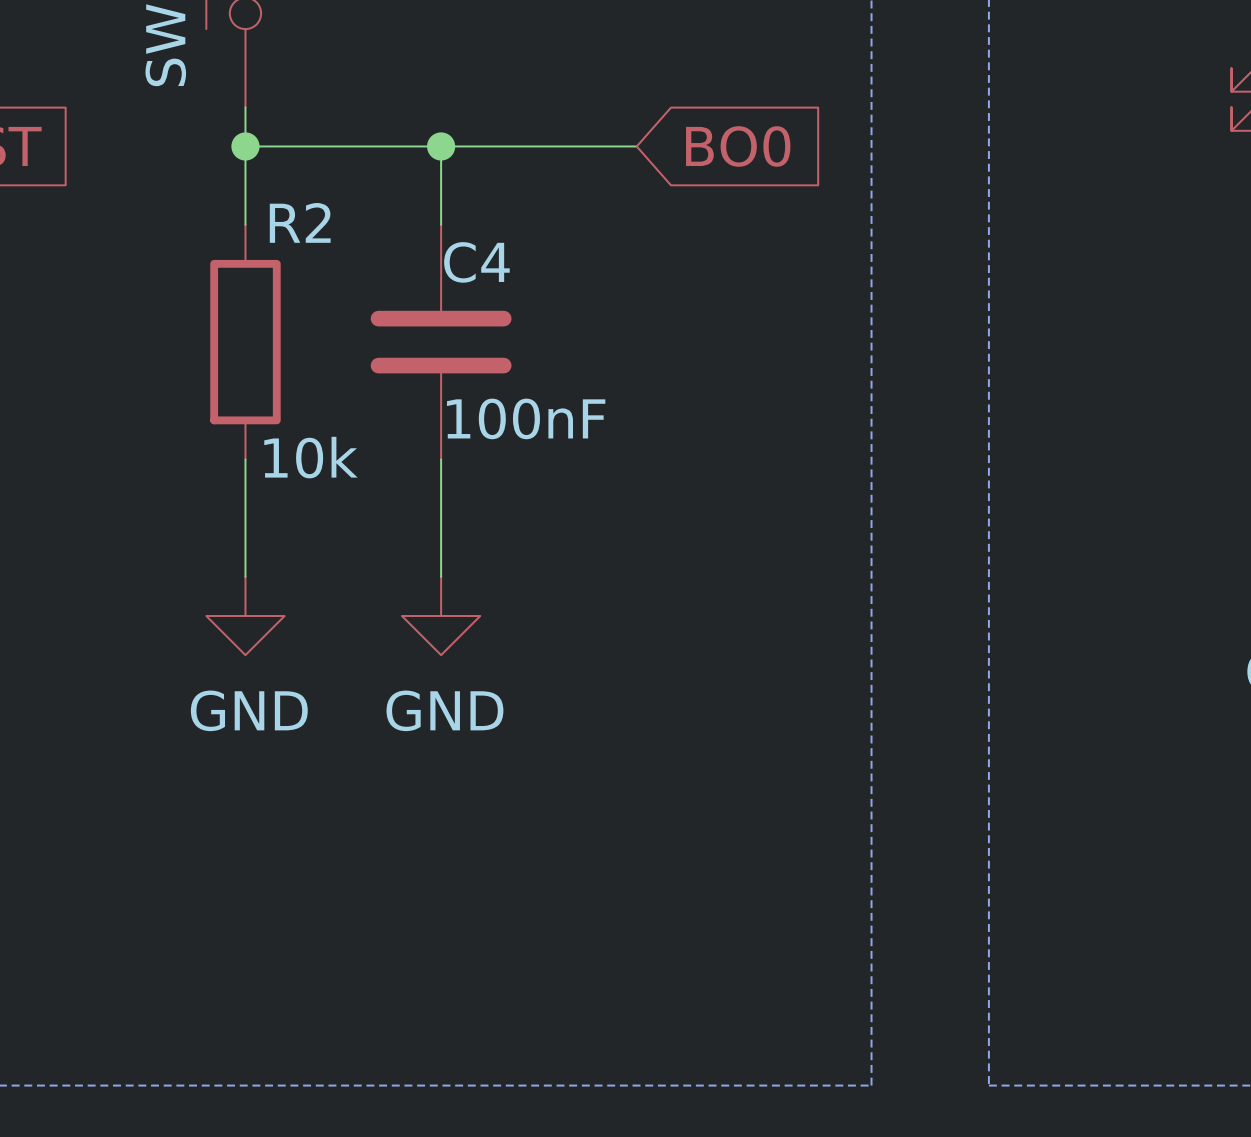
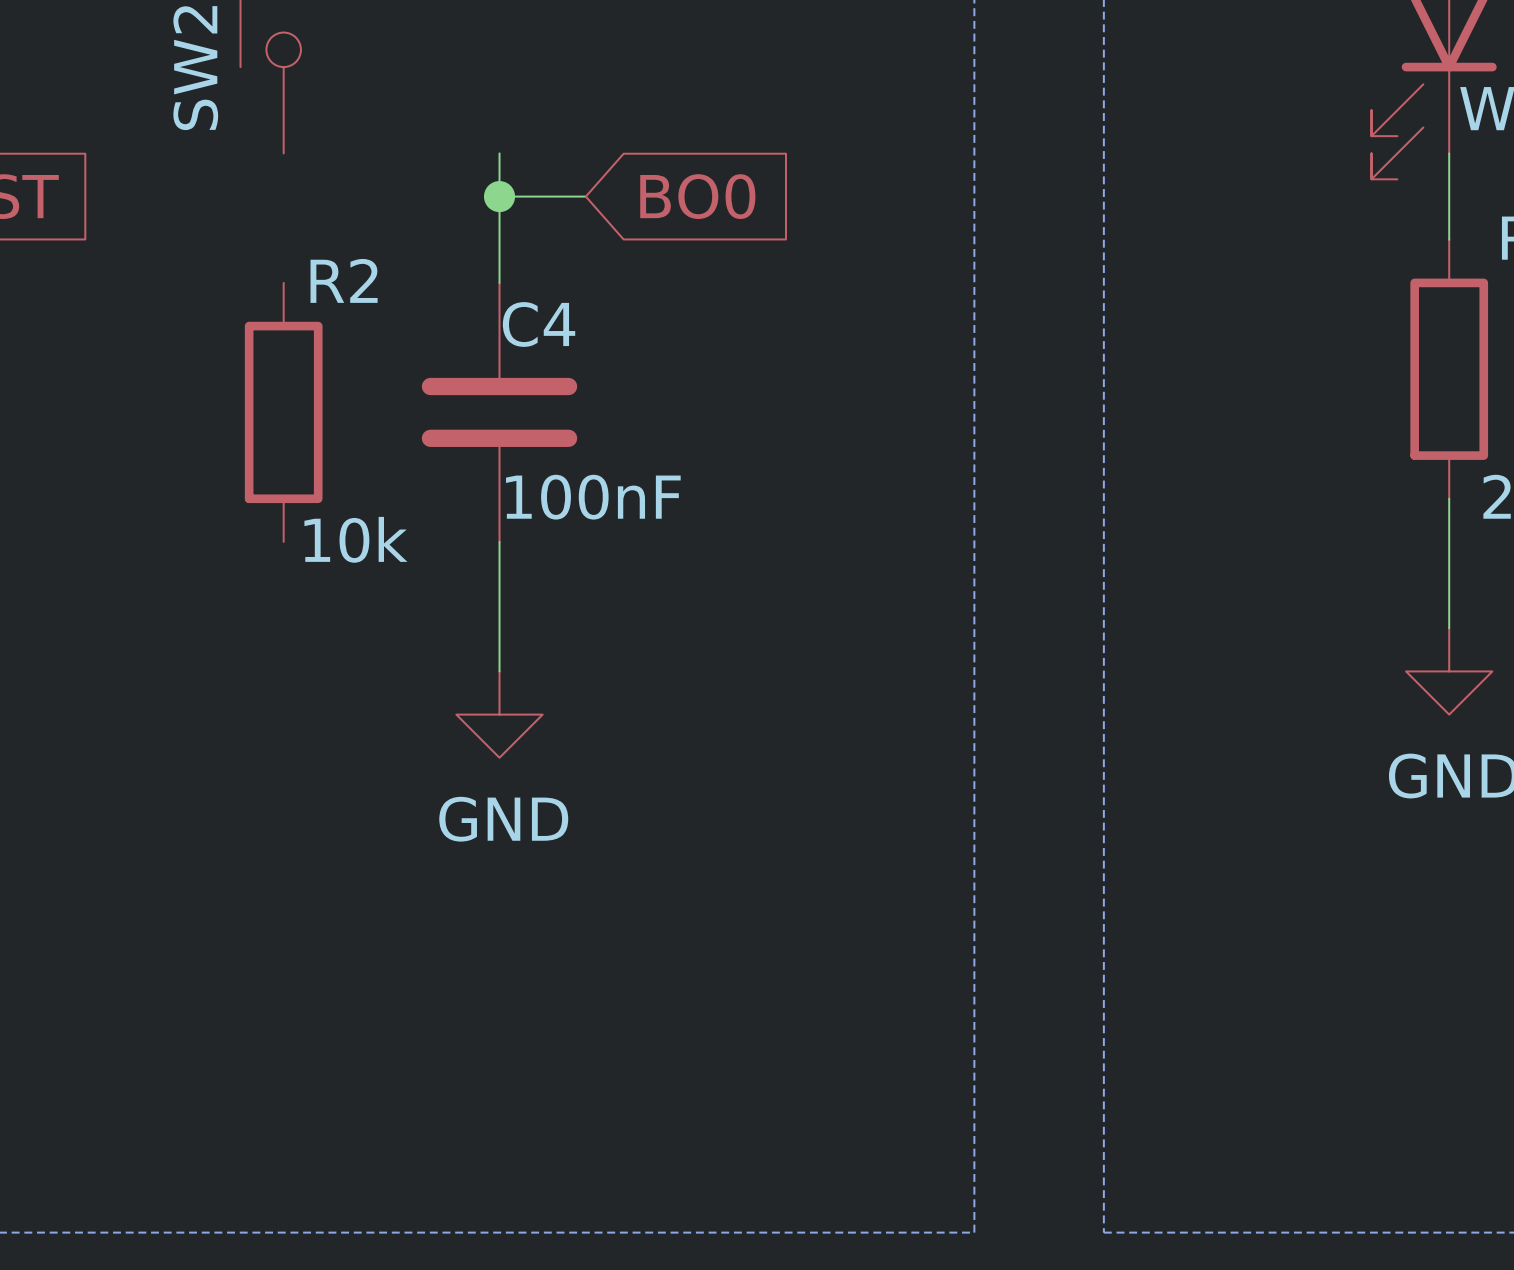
wire: (245, 107) (245, 224) -> none
wire: (245, 146) (441, 146) -> (499, 153) (499, 196)
junction: (245, 146) -> none
wire: (519, 146) (636, 146) -> none
global label position: BO0 (738, 146) -> BO0 (697, 196)
wire: (245, 459) (245, 576) -> none
power symbol: GND (245, 616) -> none

